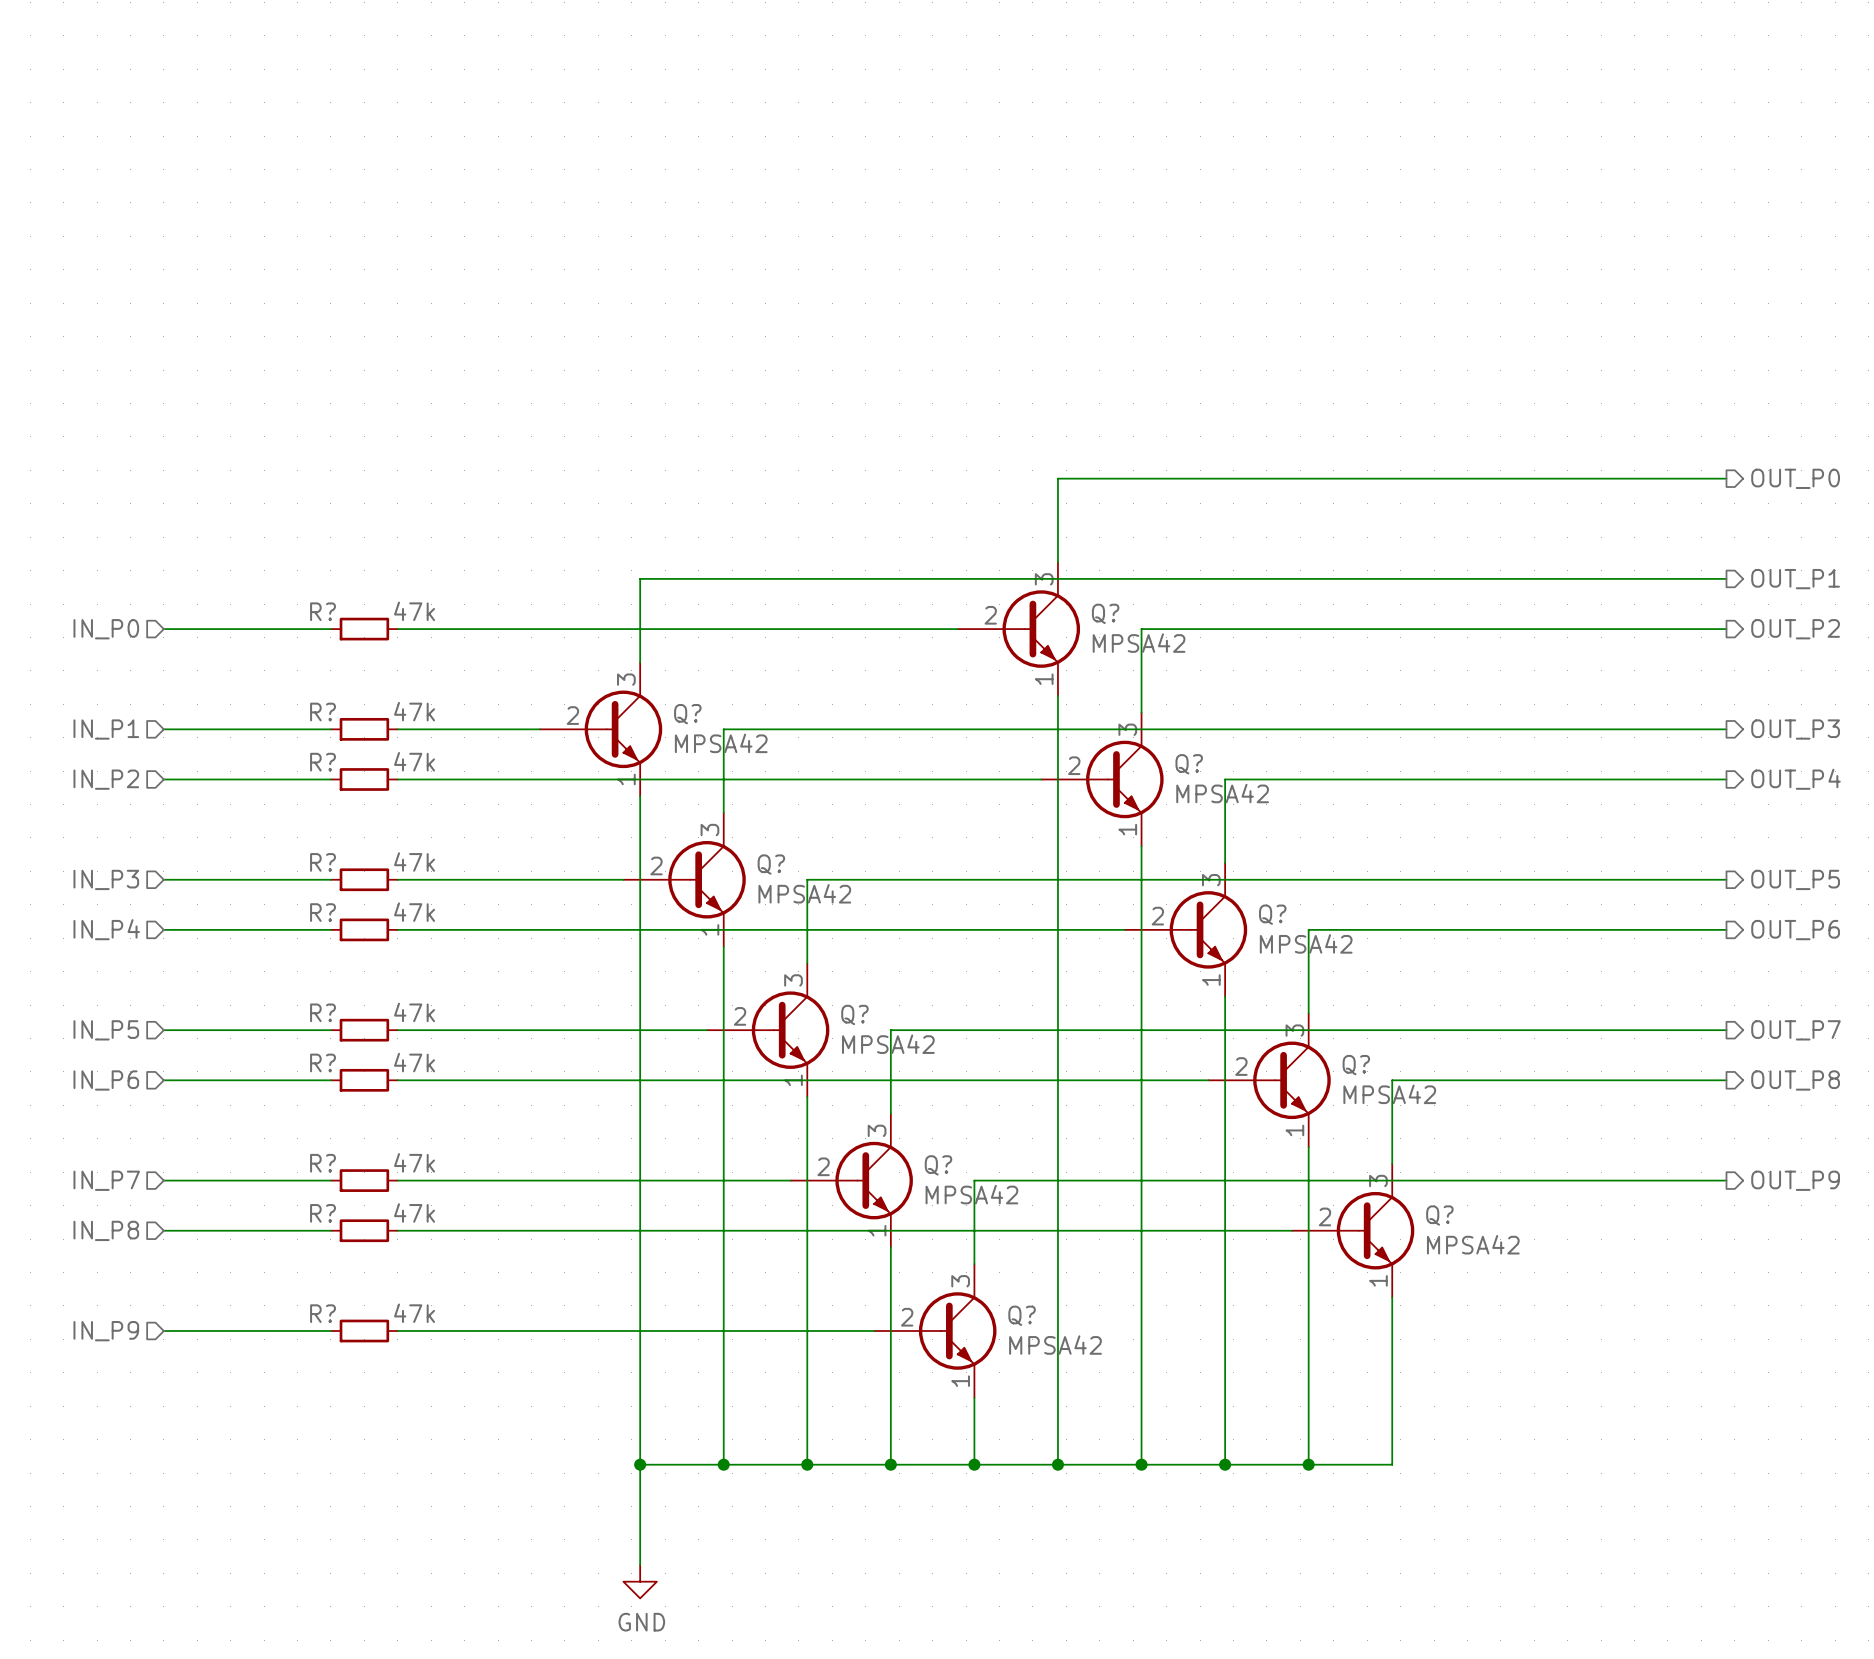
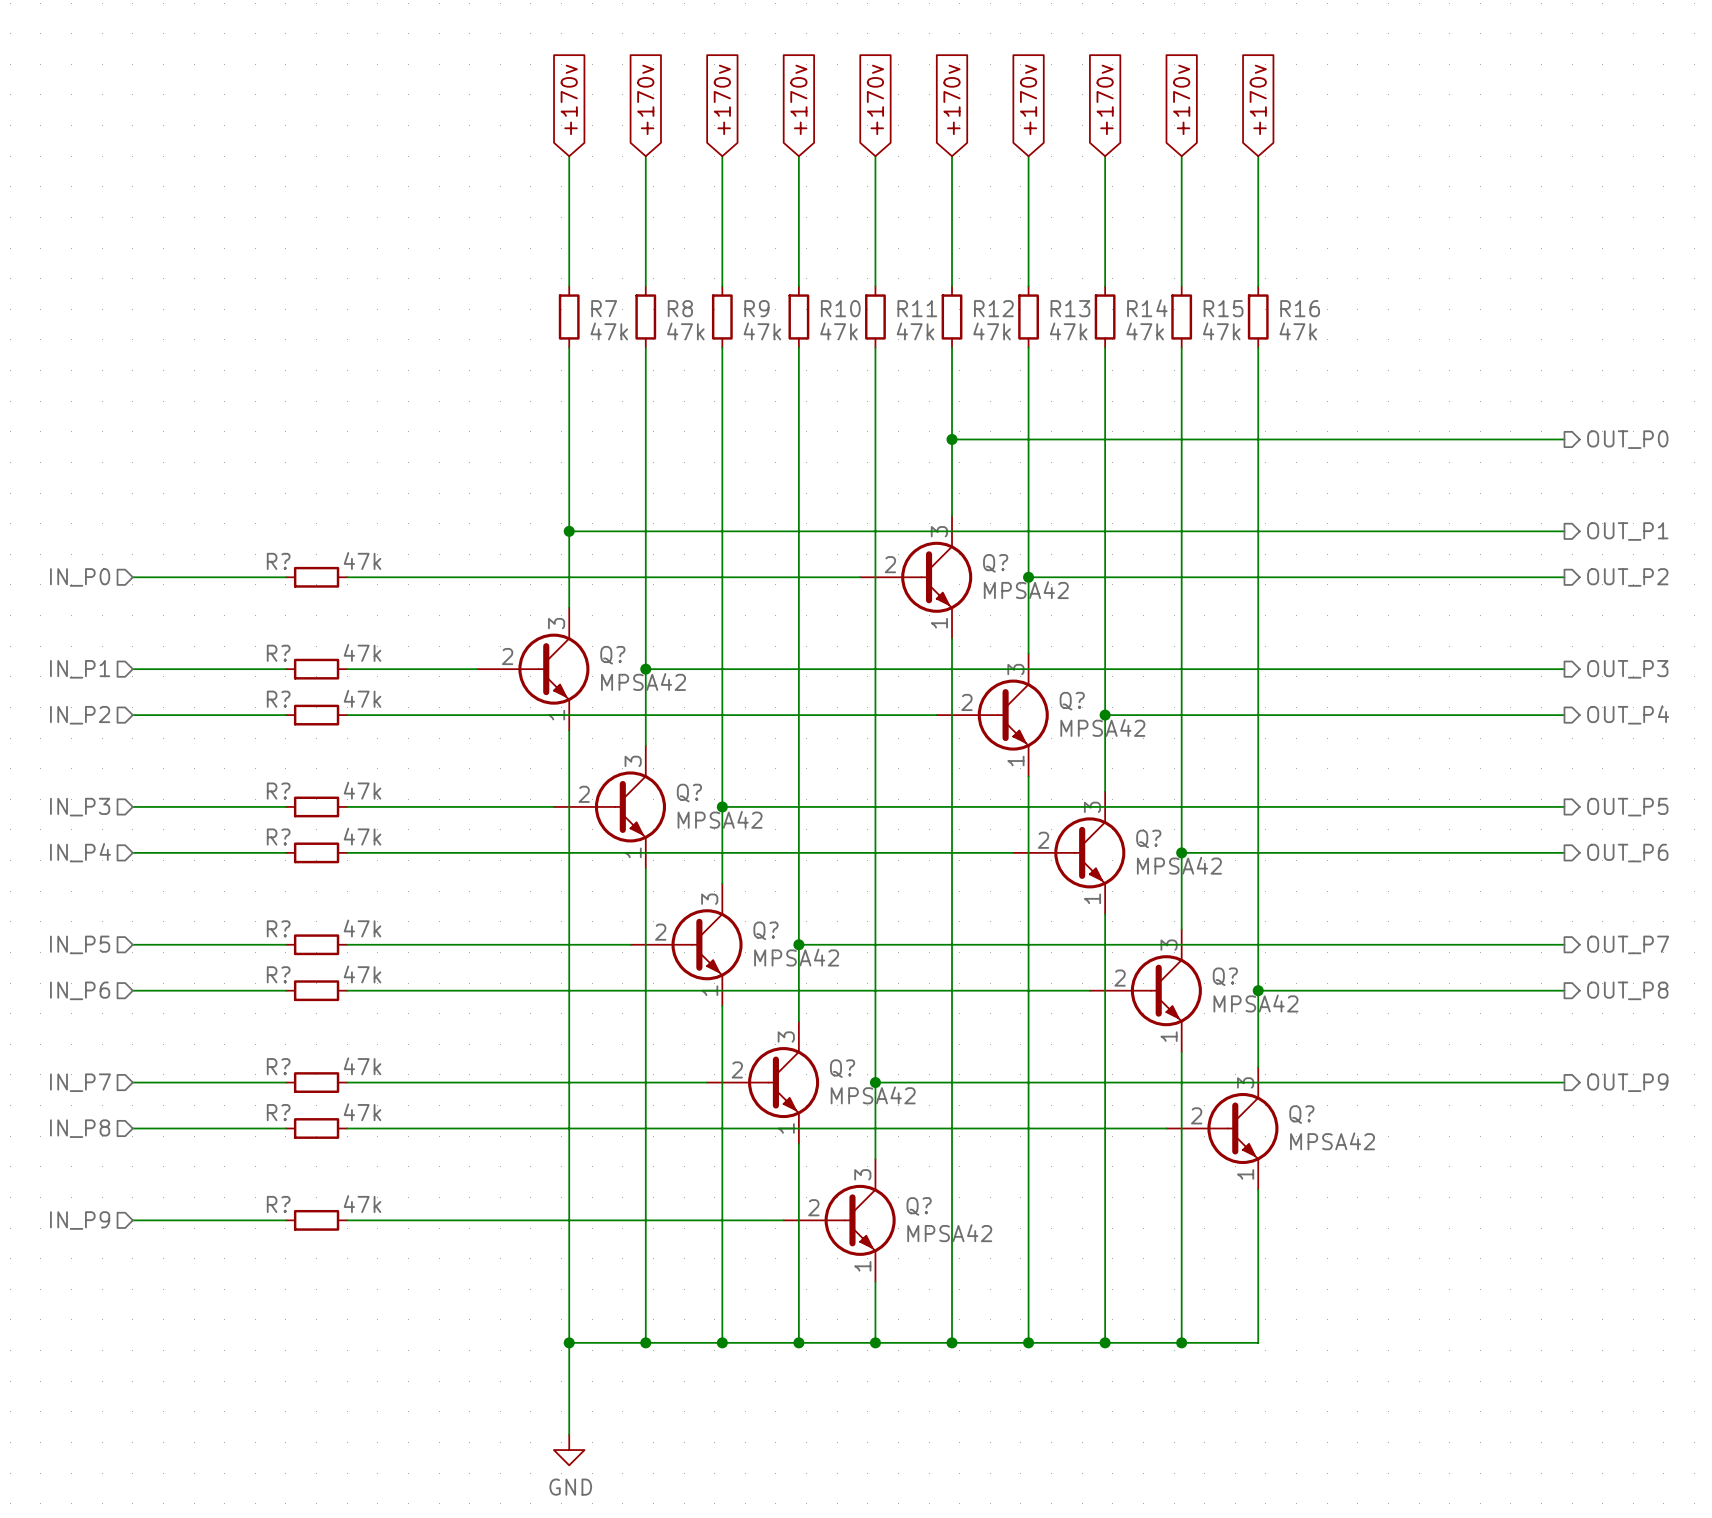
global label: none -> +170v (569, 99)
global label: none -> +170v (645, 99)
global label: none -> +170v (722, 99)
global label: none -> +170v (798, 99)
global label: none -> +170v (875, 99)
global label: none -> +170v (952, 99)
global label: none -> +170v (1028, 99)
global label: none -> +170v (1105, 99)
global label: none -> +170v (1181, 99)
global label: none -> +170v (1258, 99)
wire: none -> (569, 156) (569, 286)
wire: none -> (645, 156) (645, 286)
wire: none -> (722, 156) (722, 286)
wire: none -> (798, 156) (798, 286)
wire: none -> (875, 156) (875, 286)
wire: none -> (952, 156) (952, 286)
wire: none -> (1028, 156) (1028, 286)
wire: none -> (1105, 156) (1105, 286)
wire: none -> (1181, 156) (1181, 286)
wire: none -> (1258, 156) (1258, 286)
R7: none -> 47k (569, 316)
R8: none -> 47k (645, 316)
R9: none -> 47k (722, 316)
R10: none -> 47k (798, 316)
R11: none -> 47k (875, 316)
R12: none -> 47k (952, 316)
R13: none -> 47k (1028, 316)
R14: none -> 47k (1105, 316)
R15: none -> 47k (1181, 316)
R16: none -> 47k (1258, 316)
wire: none -> (569, 347) (569, 531)
wire: none -> (645, 347) (645, 669)
wire: none -> (722, 347) (722, 806)
wire: none -> (798, 347) (798, 944)
wire: none -> (875, 347) (875, 1082)
wire: none -> (952, 347) (952, 439)
wire: none -> (1028, 347) (1028, 577)
wire: none -> (1105, 347) (1105, 715)
wire: none -> (1181, 347) (1181, 852)
wire: none -> (1258, 347) (1258, 990)
junction: none -> (952, 439)
junction: none -> (569, 531)
junction: none -> (1028, 577)
junction: none -> (645, 669)
junction: none -> (1105, 715)
junction: none -> (722, 806)
junction: none -> (1181, 852)
junction: none -> (798, 944)
junction: none -> (1258, 990)
junction: none -> (875, 1082)

